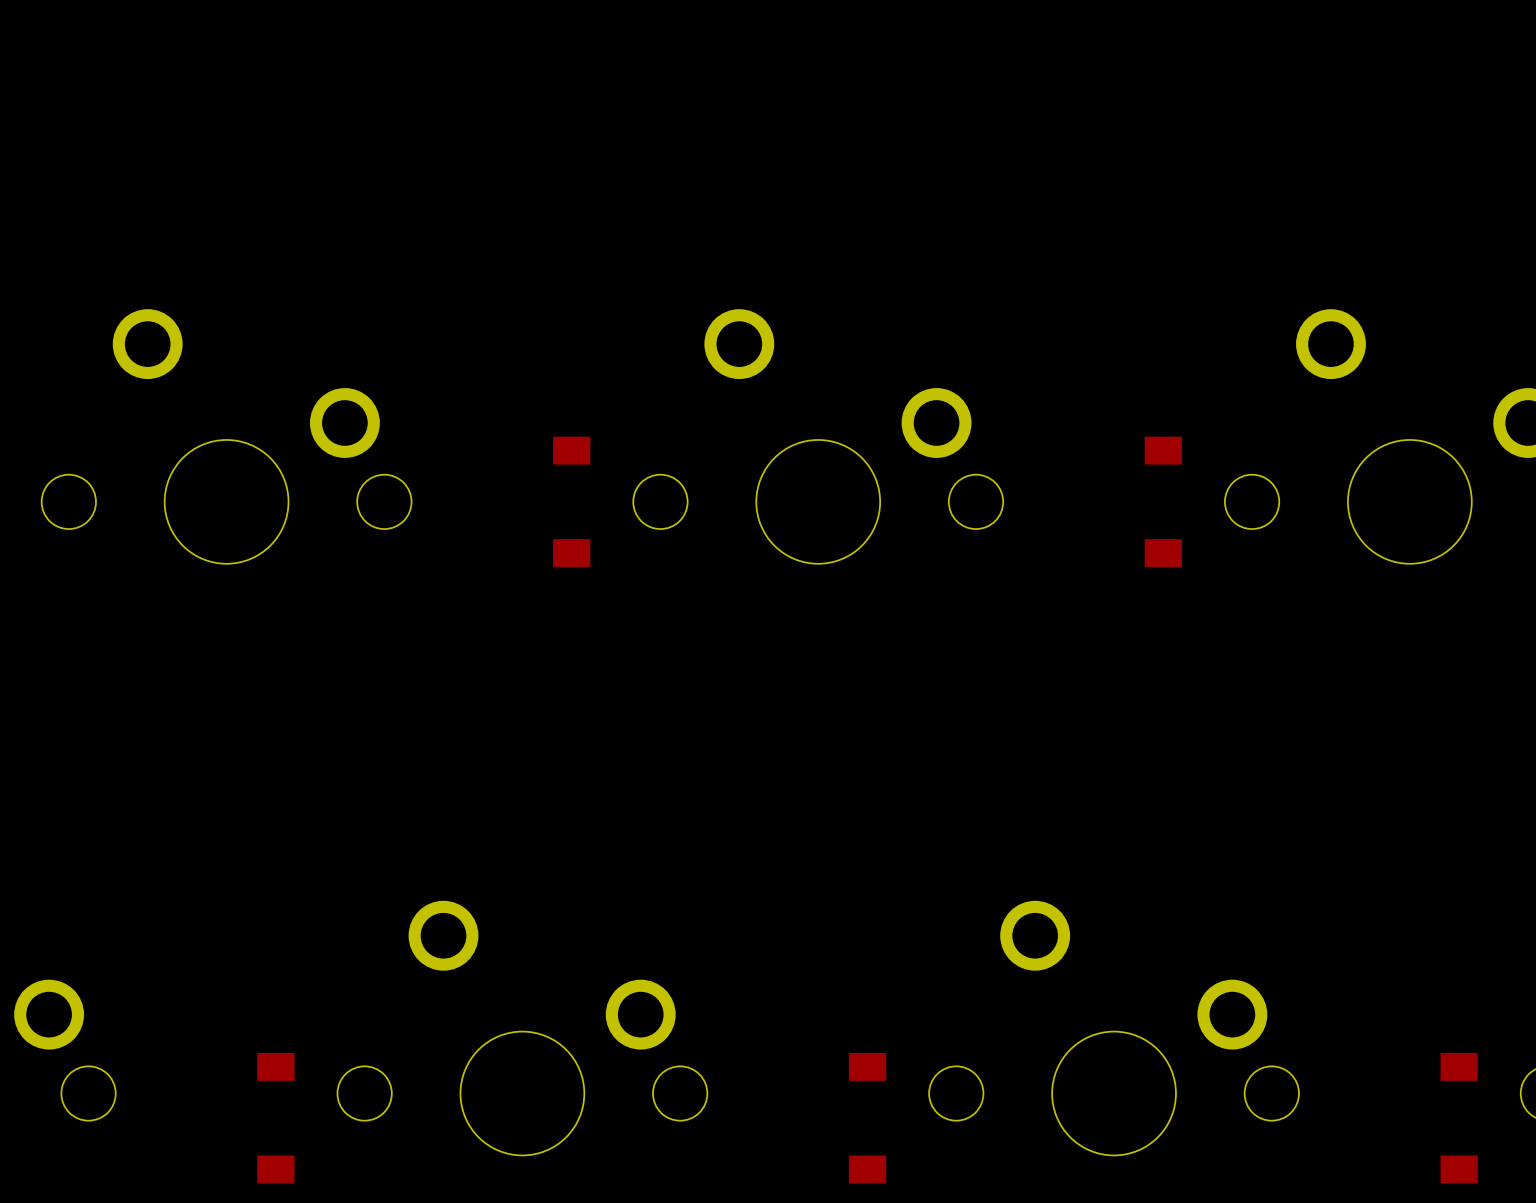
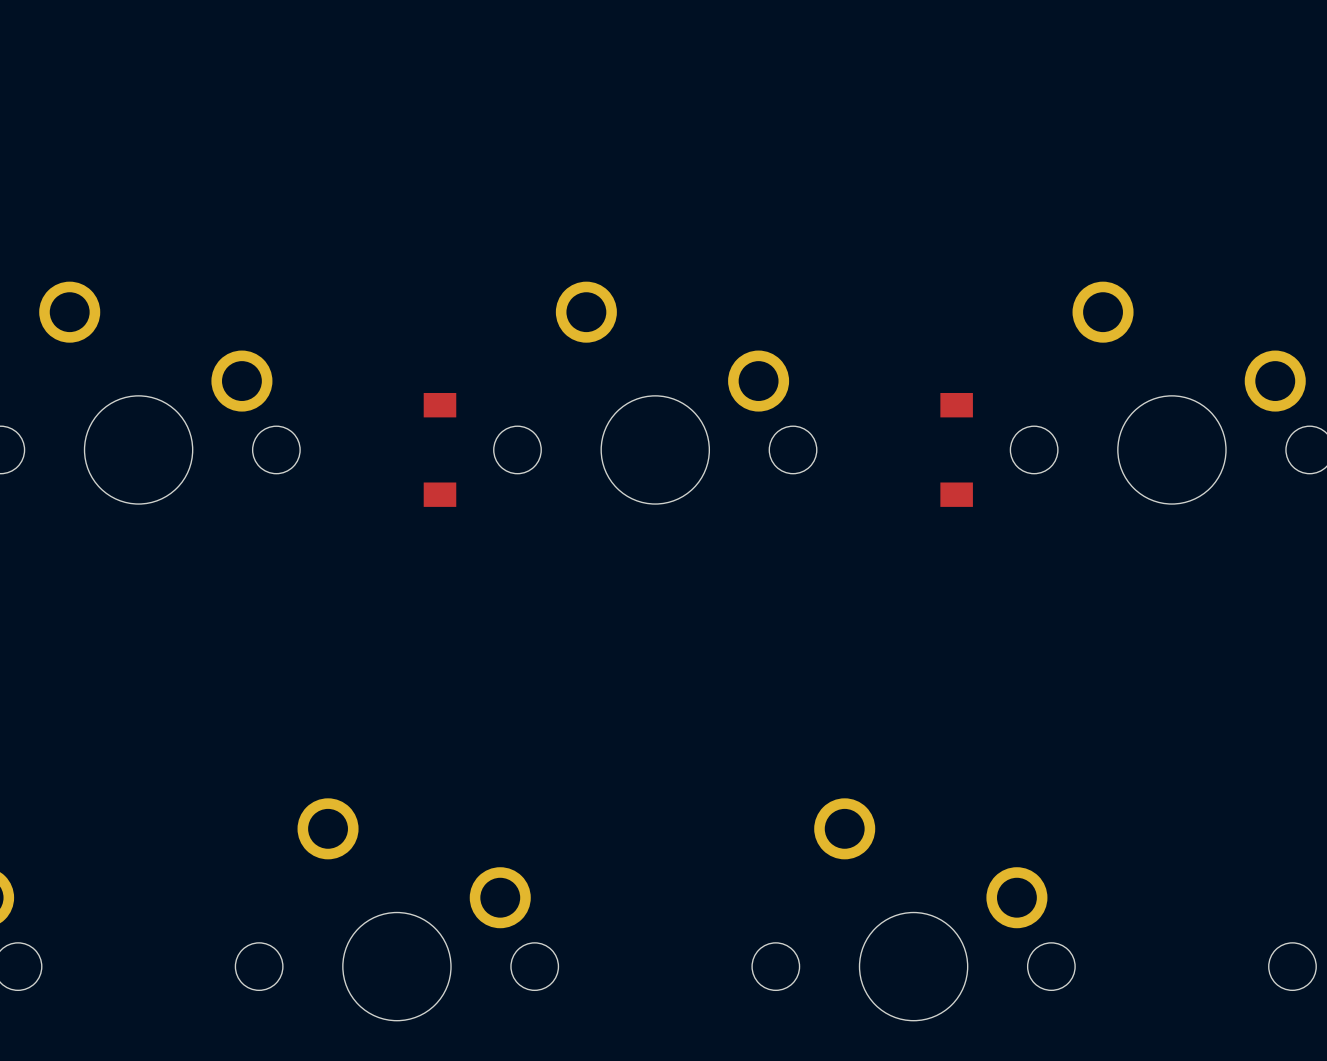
part: (275, 1118) -> none
part: (867, 1118) -> none
part: (1459, 1118) -> none

